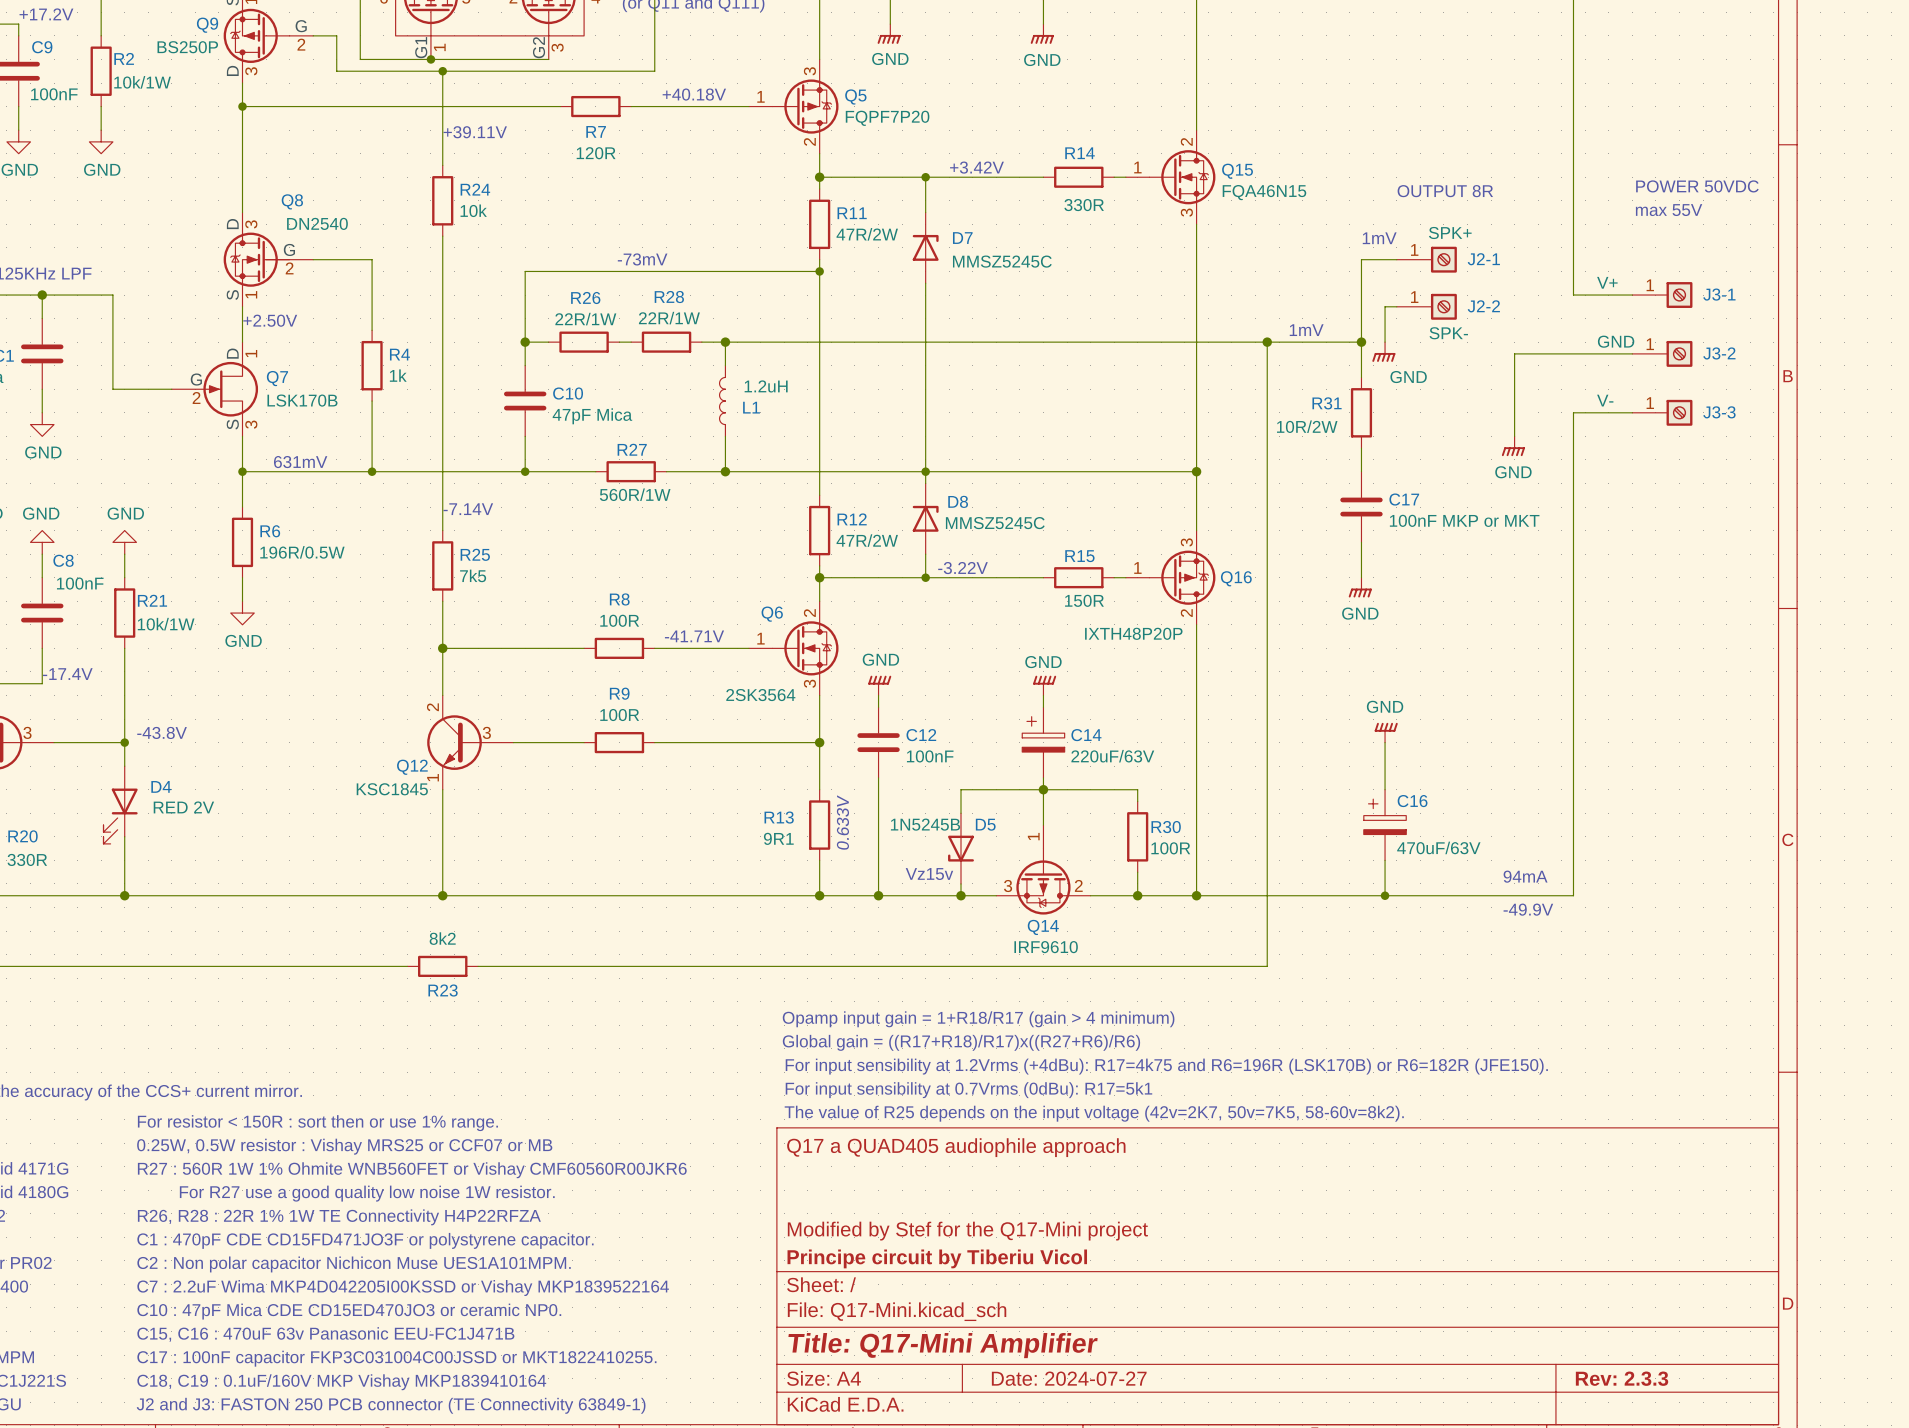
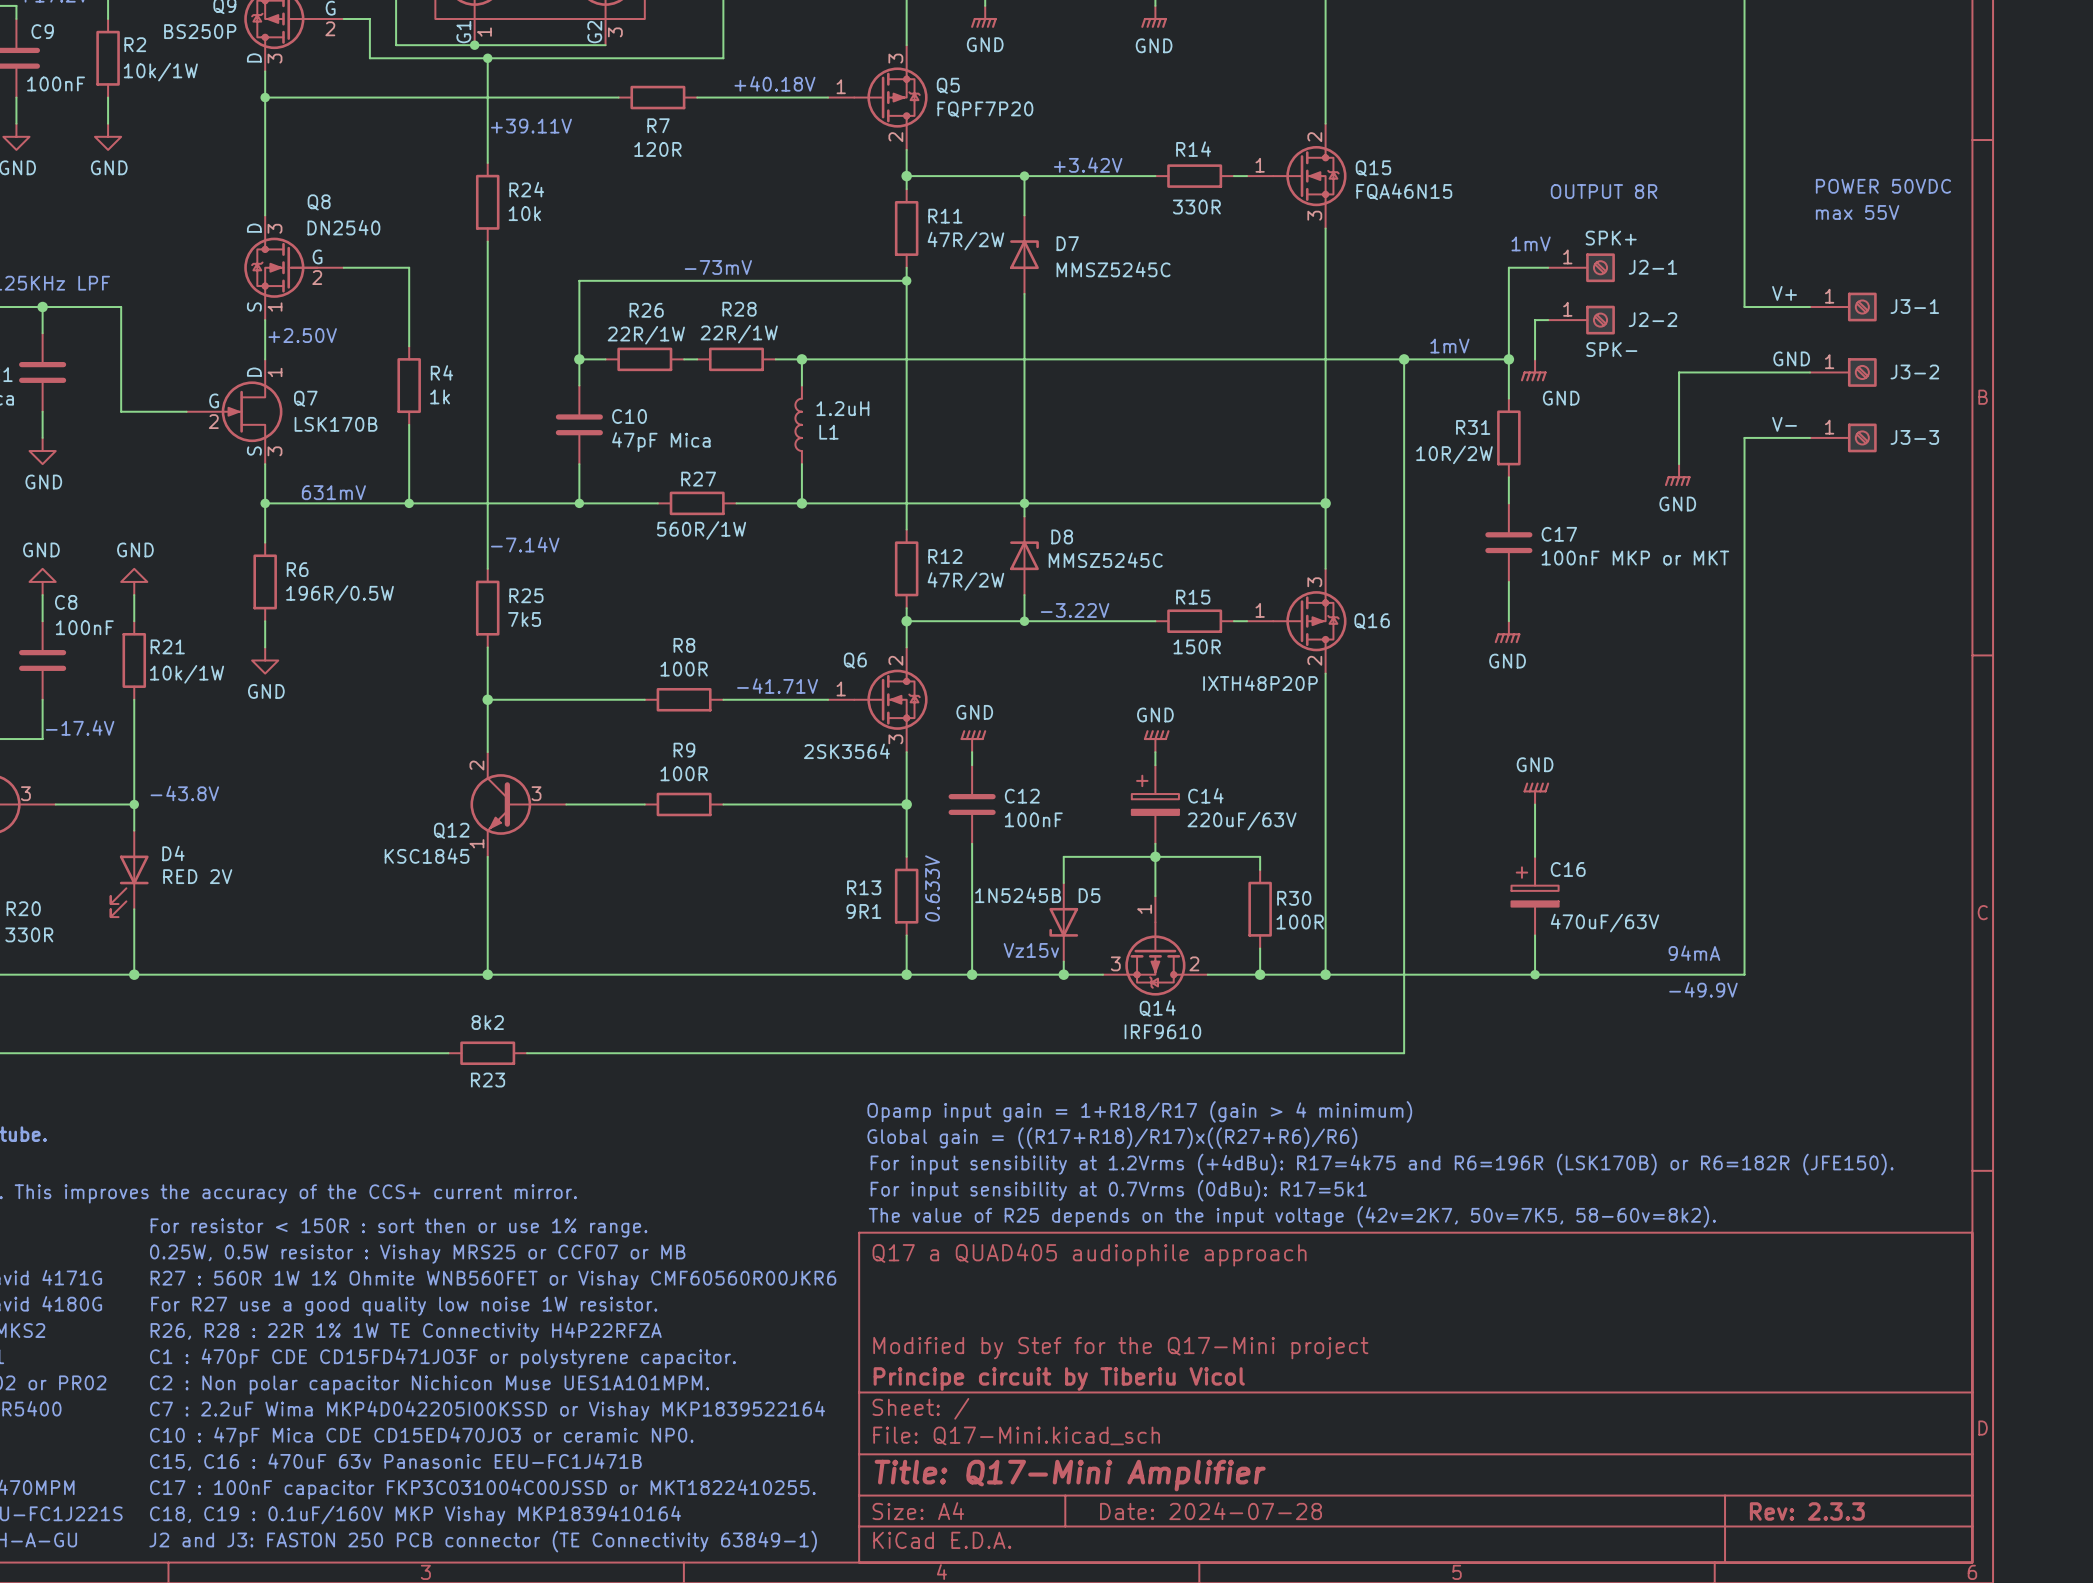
title block: Date: 2024-07-27 (1069, 1378) -> Date: 2024-07-28 (1211, 1511)

